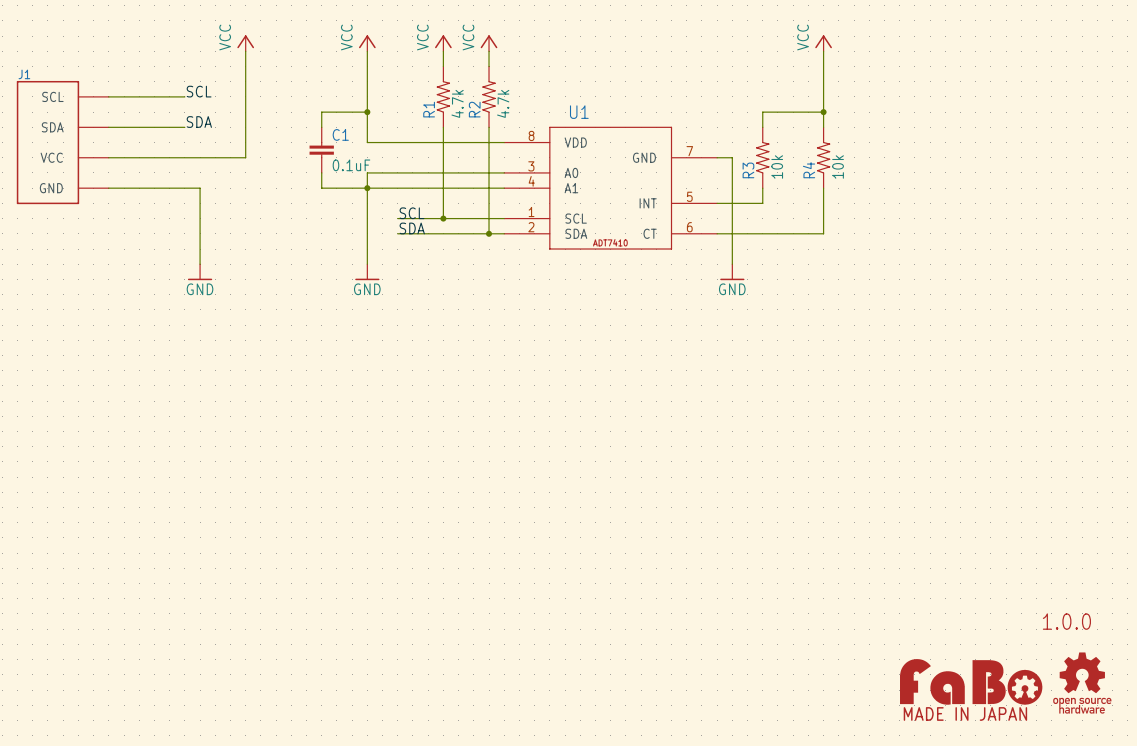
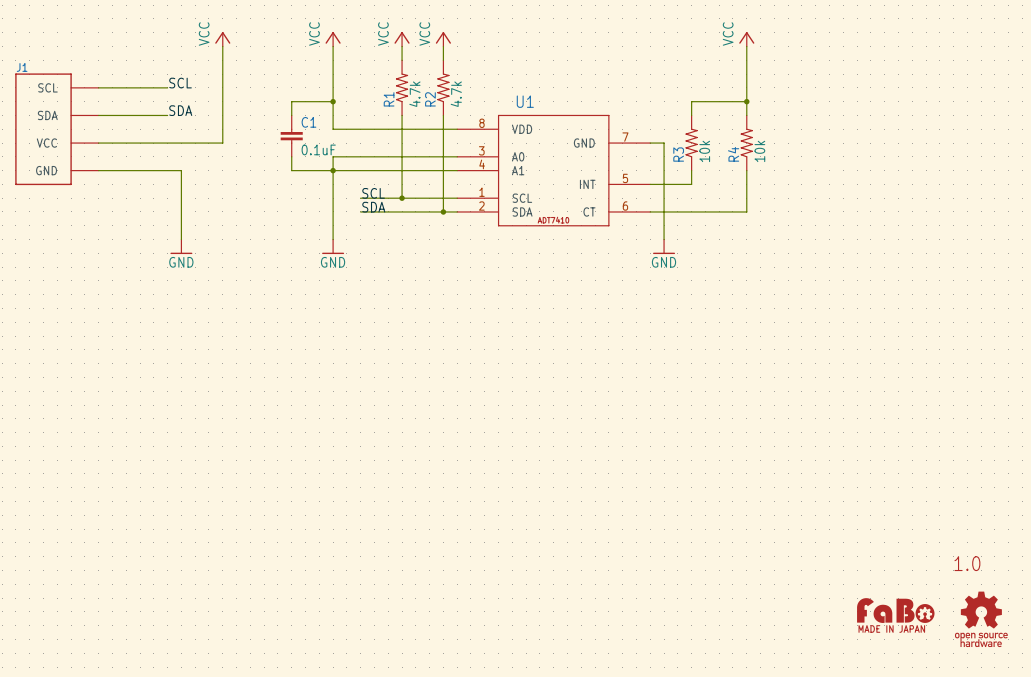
text: 1.0.0 (1066, 621) -> 1.0 (967, 563)
part: none -> (895, 610)
part: (971, 681) -> none

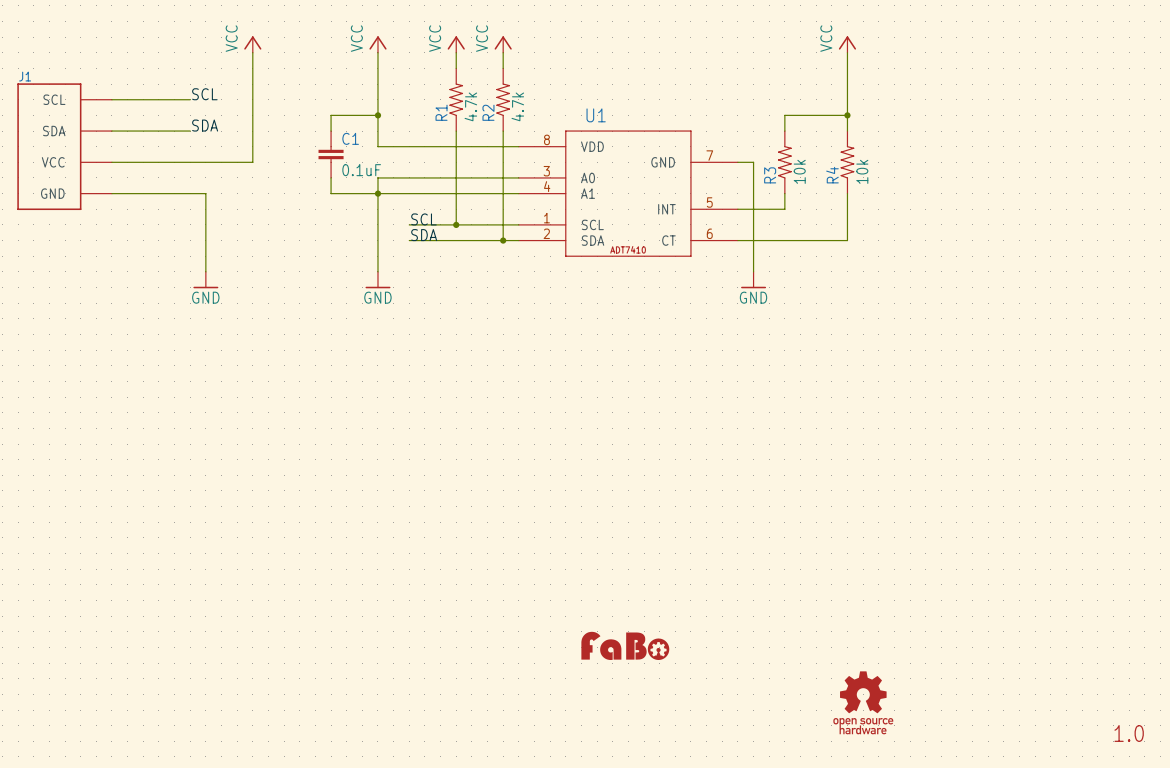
text position: 1.0 (967, 563) -> 1.0 (1129, 733)
part: none -> (625, 645)
part: (895, 610) -> none
part: none -> (863, 702)
part: (981, 619) -> none

